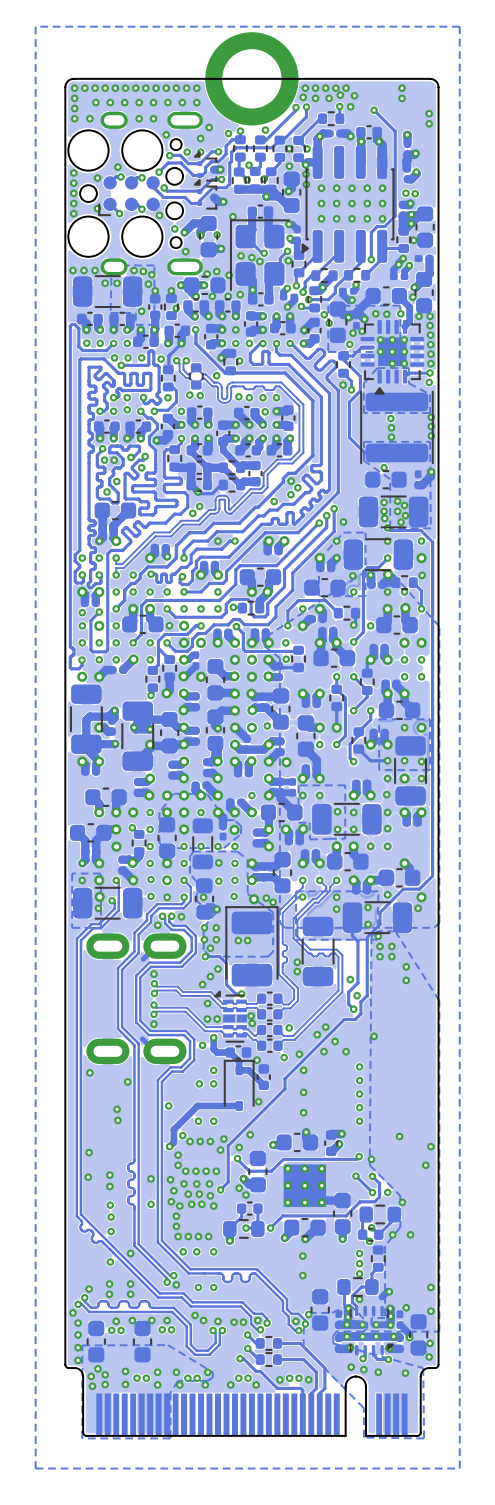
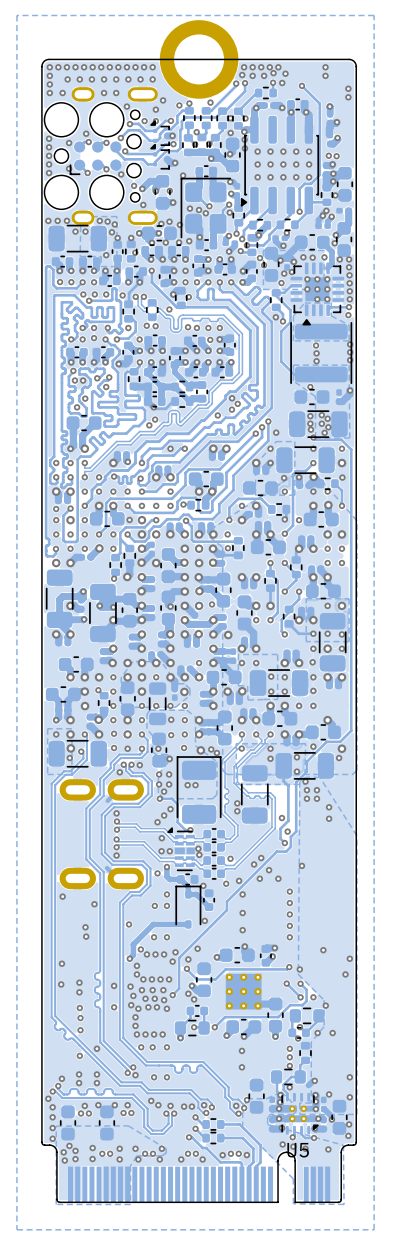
part: (371, 1330) -> none
U5: none -> (299, 1113)

